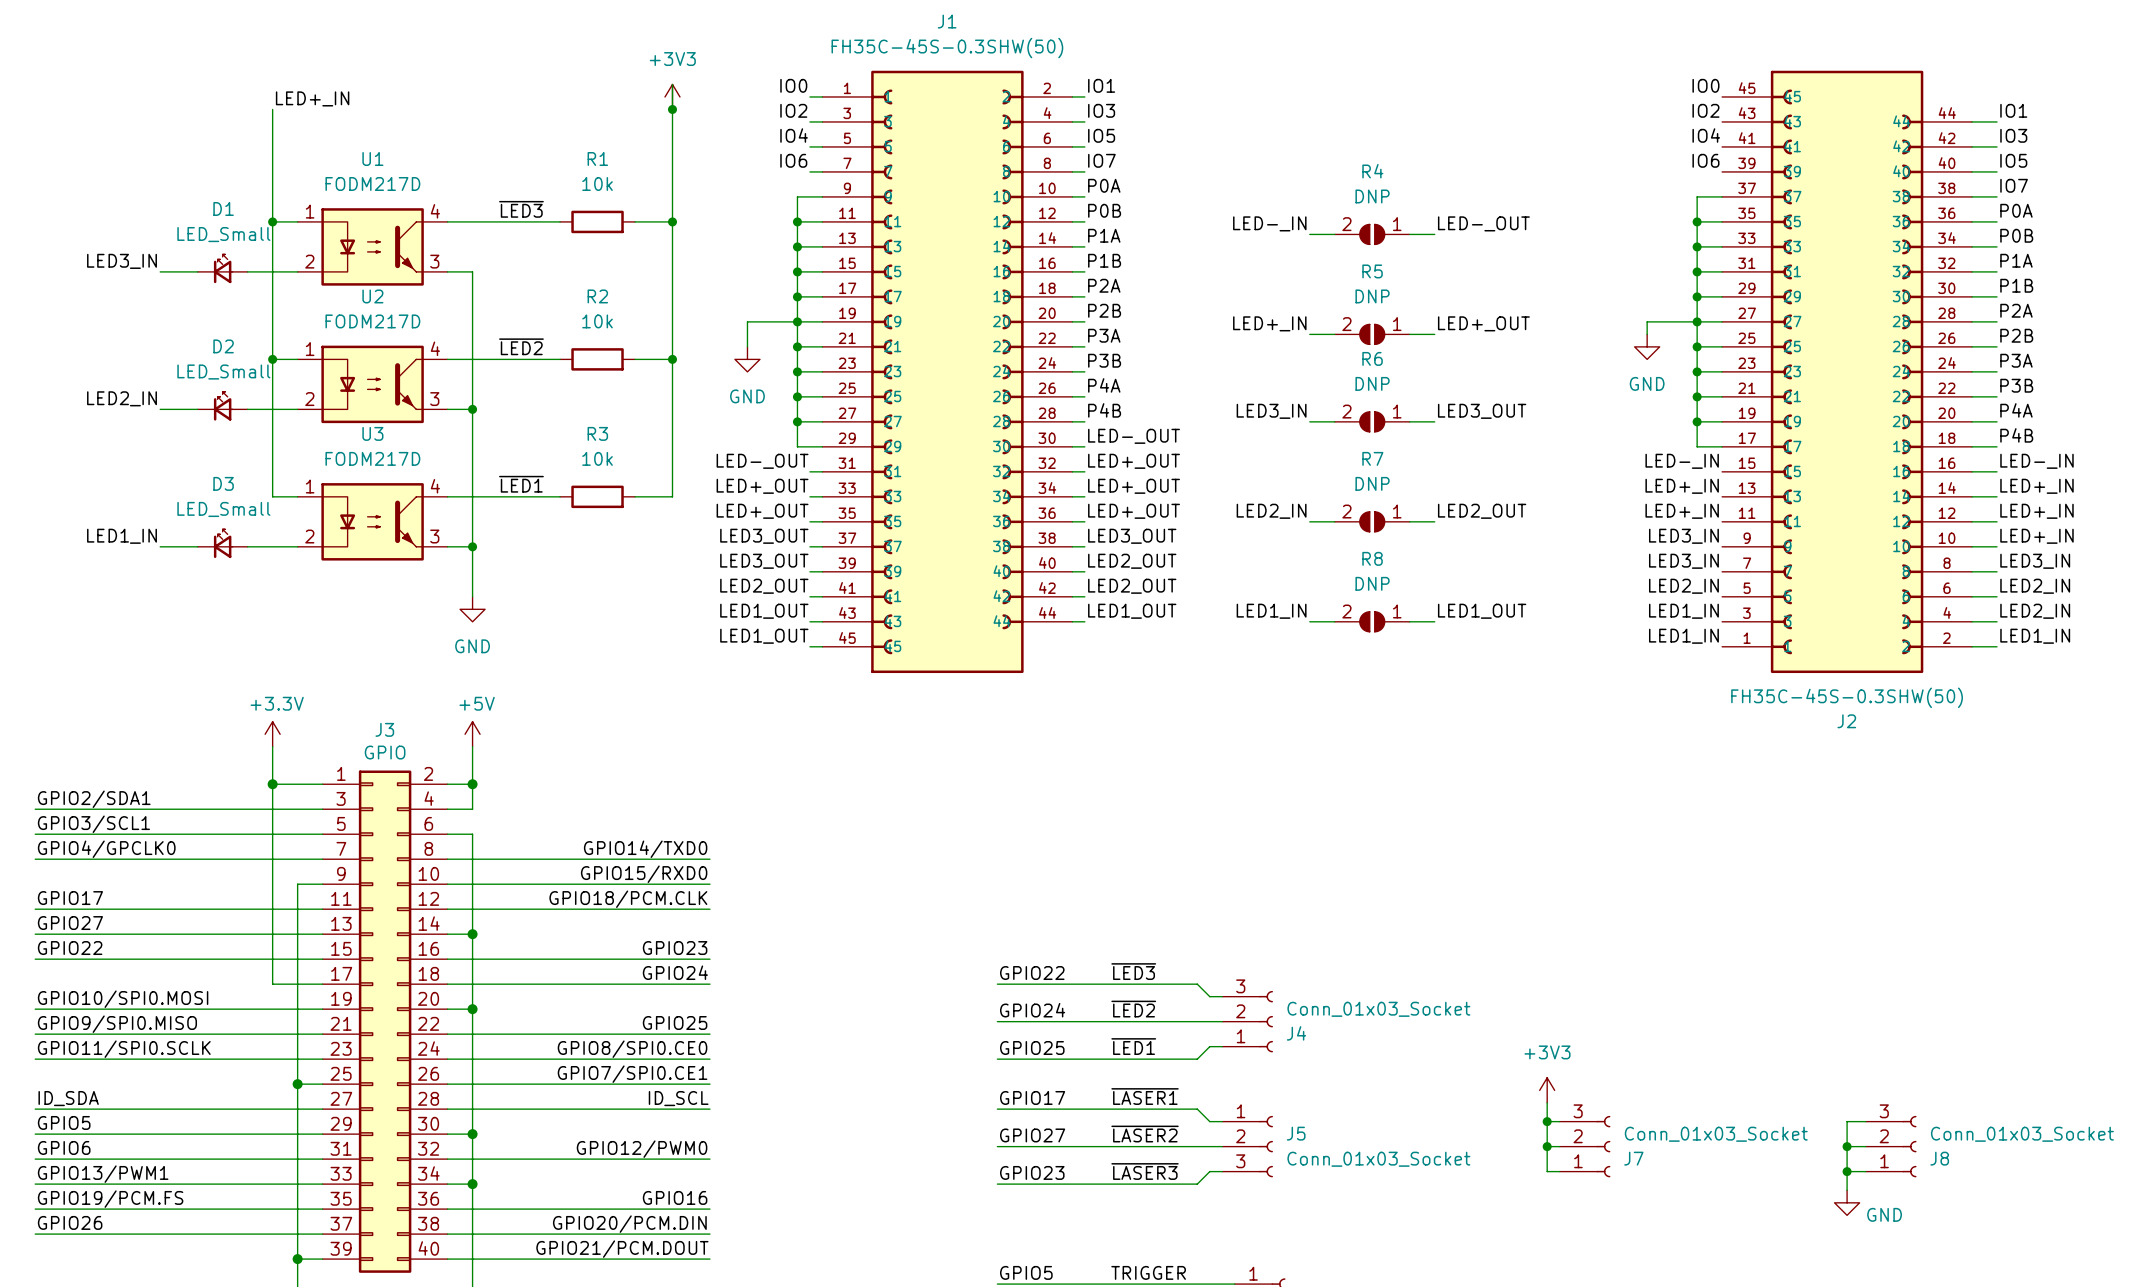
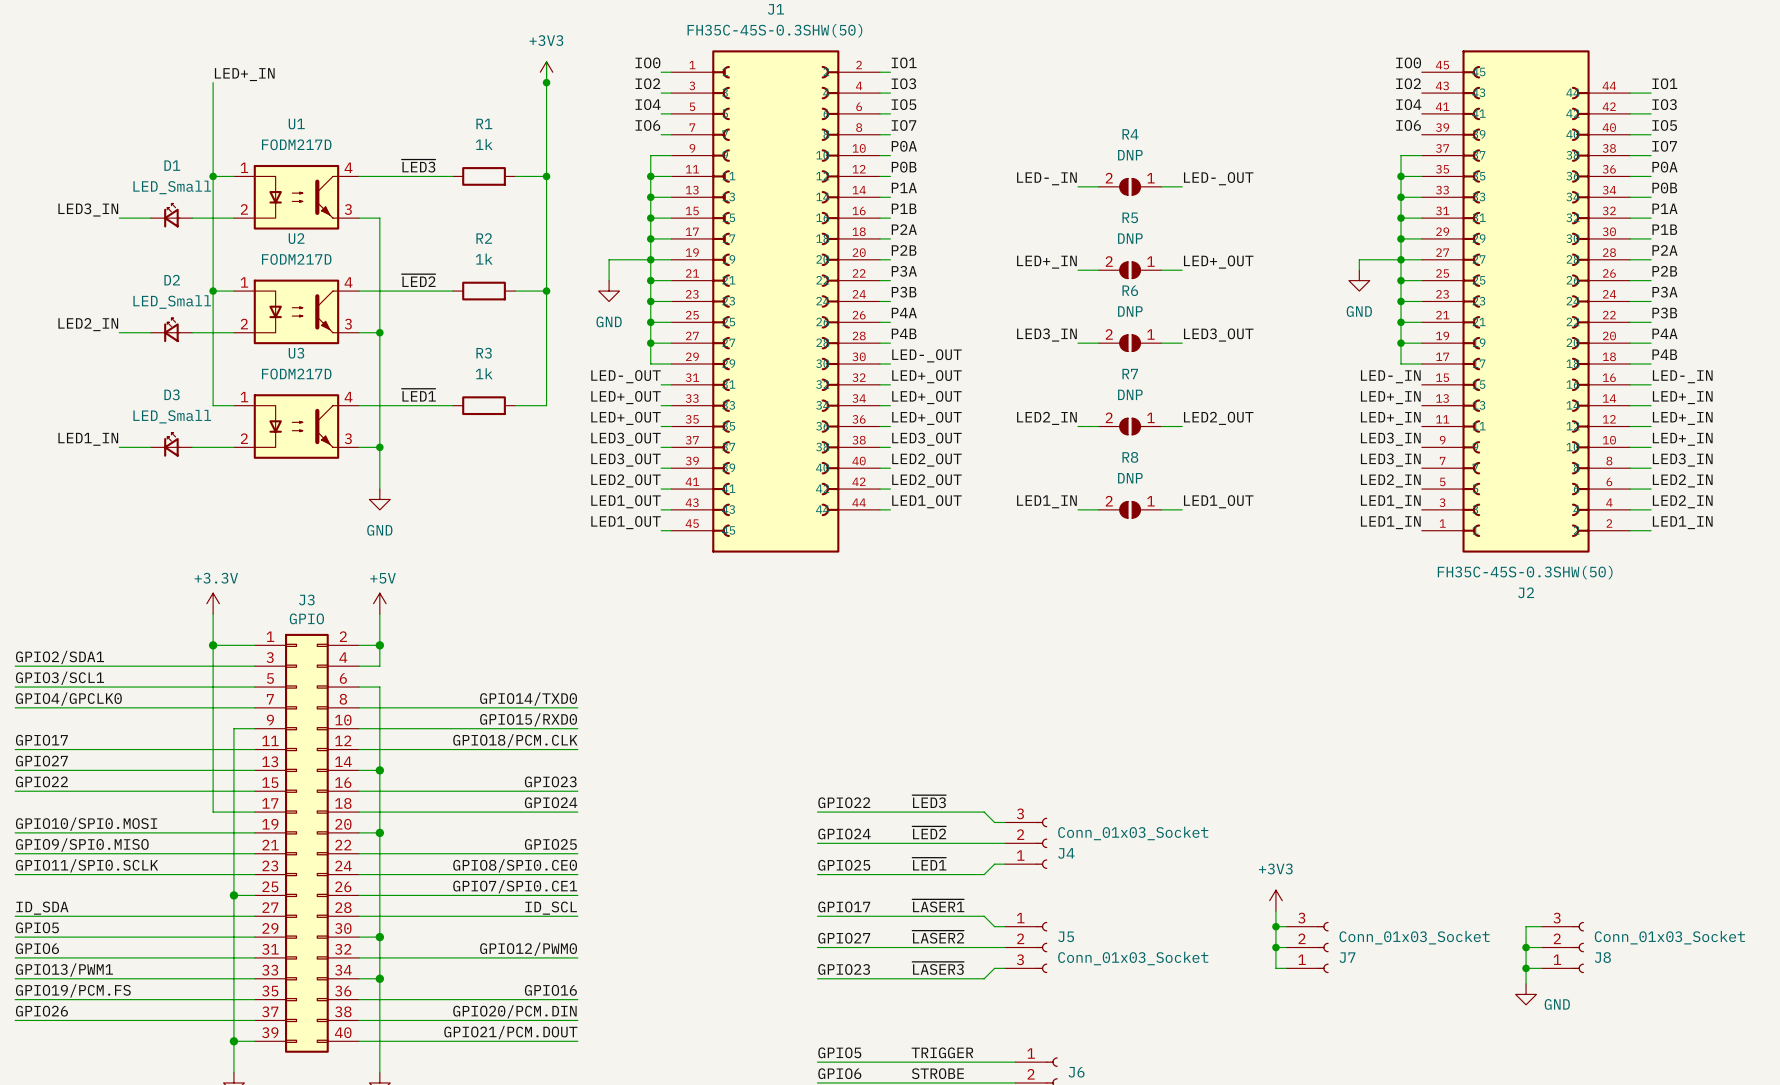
R1 value: 10k (597, 183) -> 1k (484, 144)
R2 value: 10k (597, 321) -> 1k (484, 259)
R3 value: 10k (597, 458) -> 1k (484, 373)

